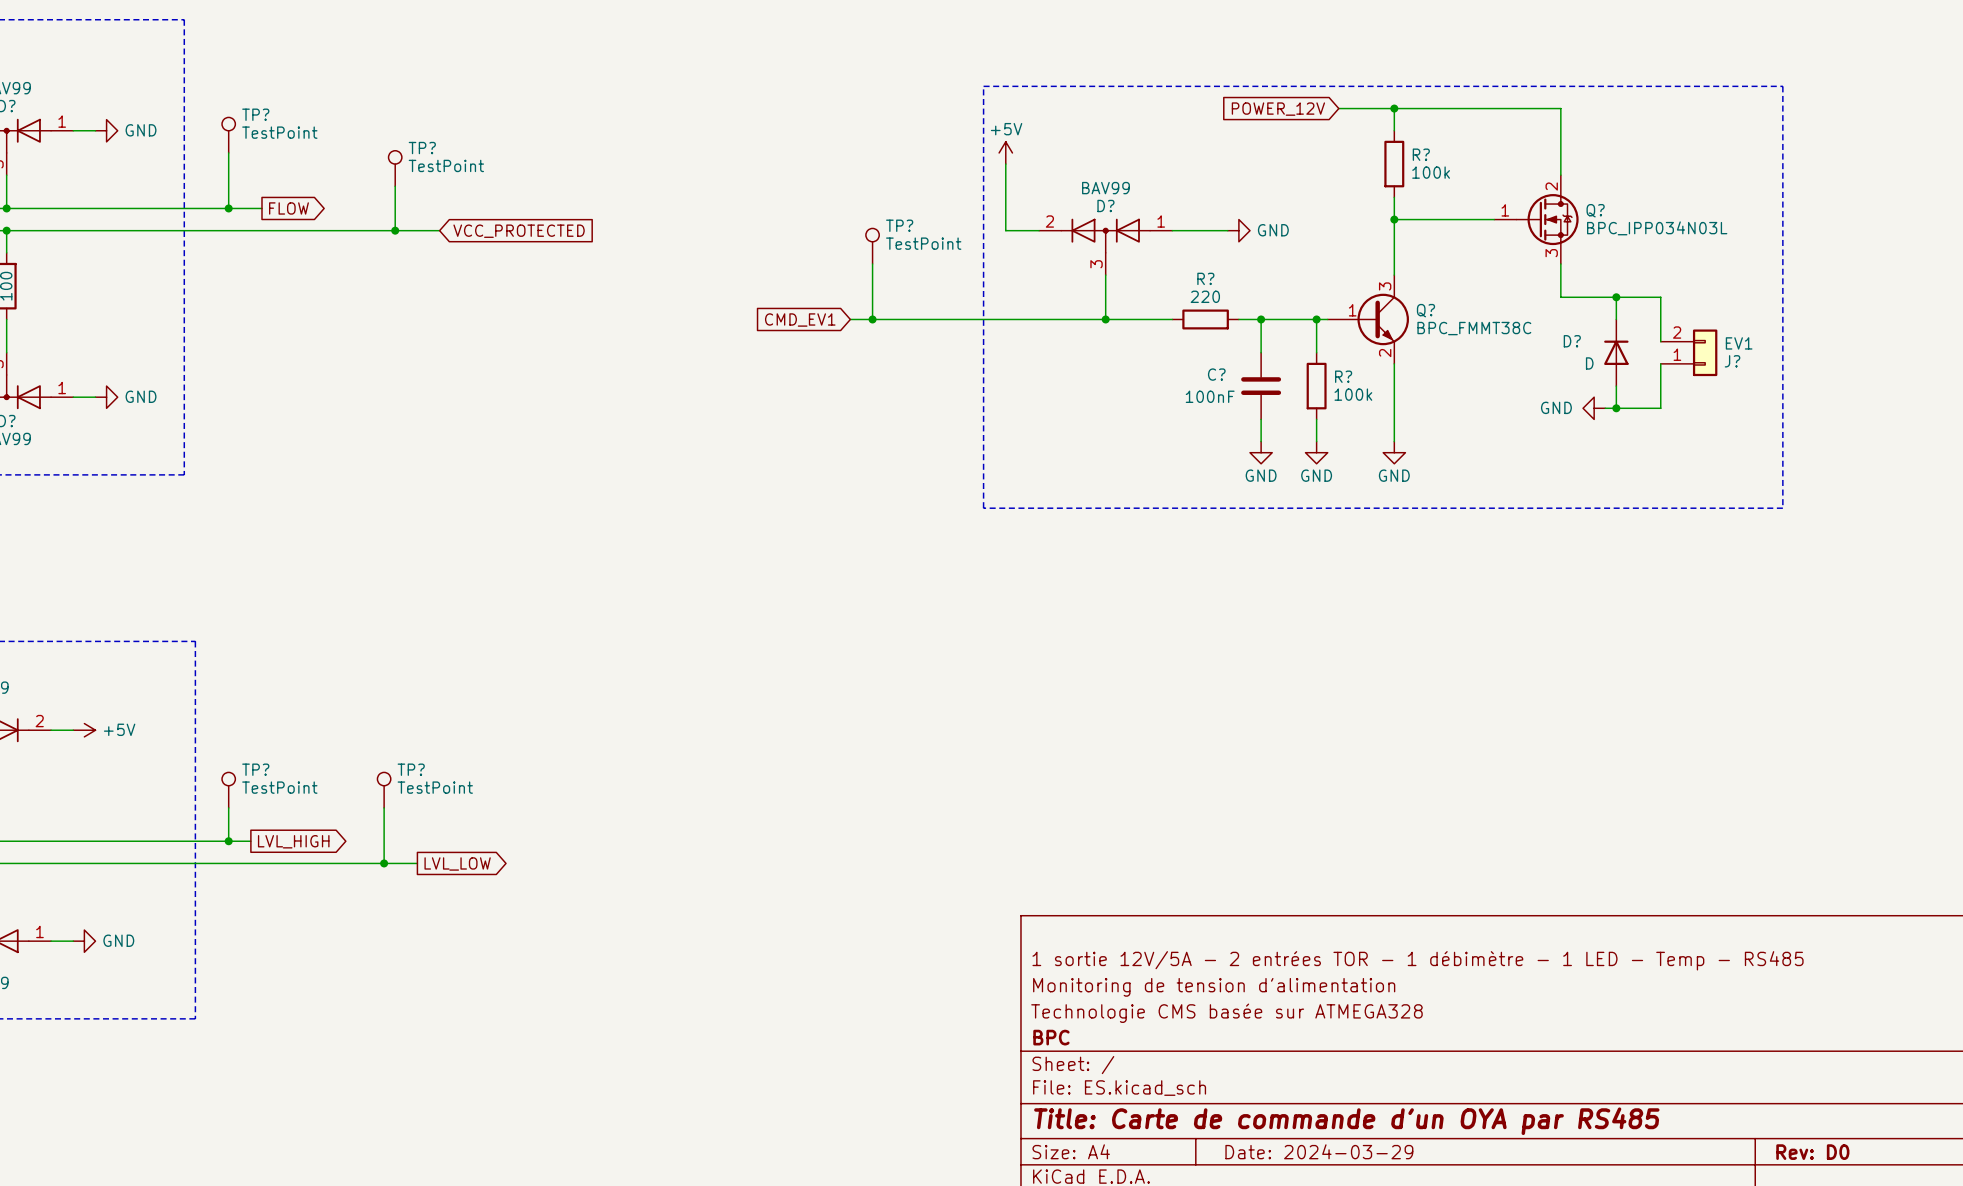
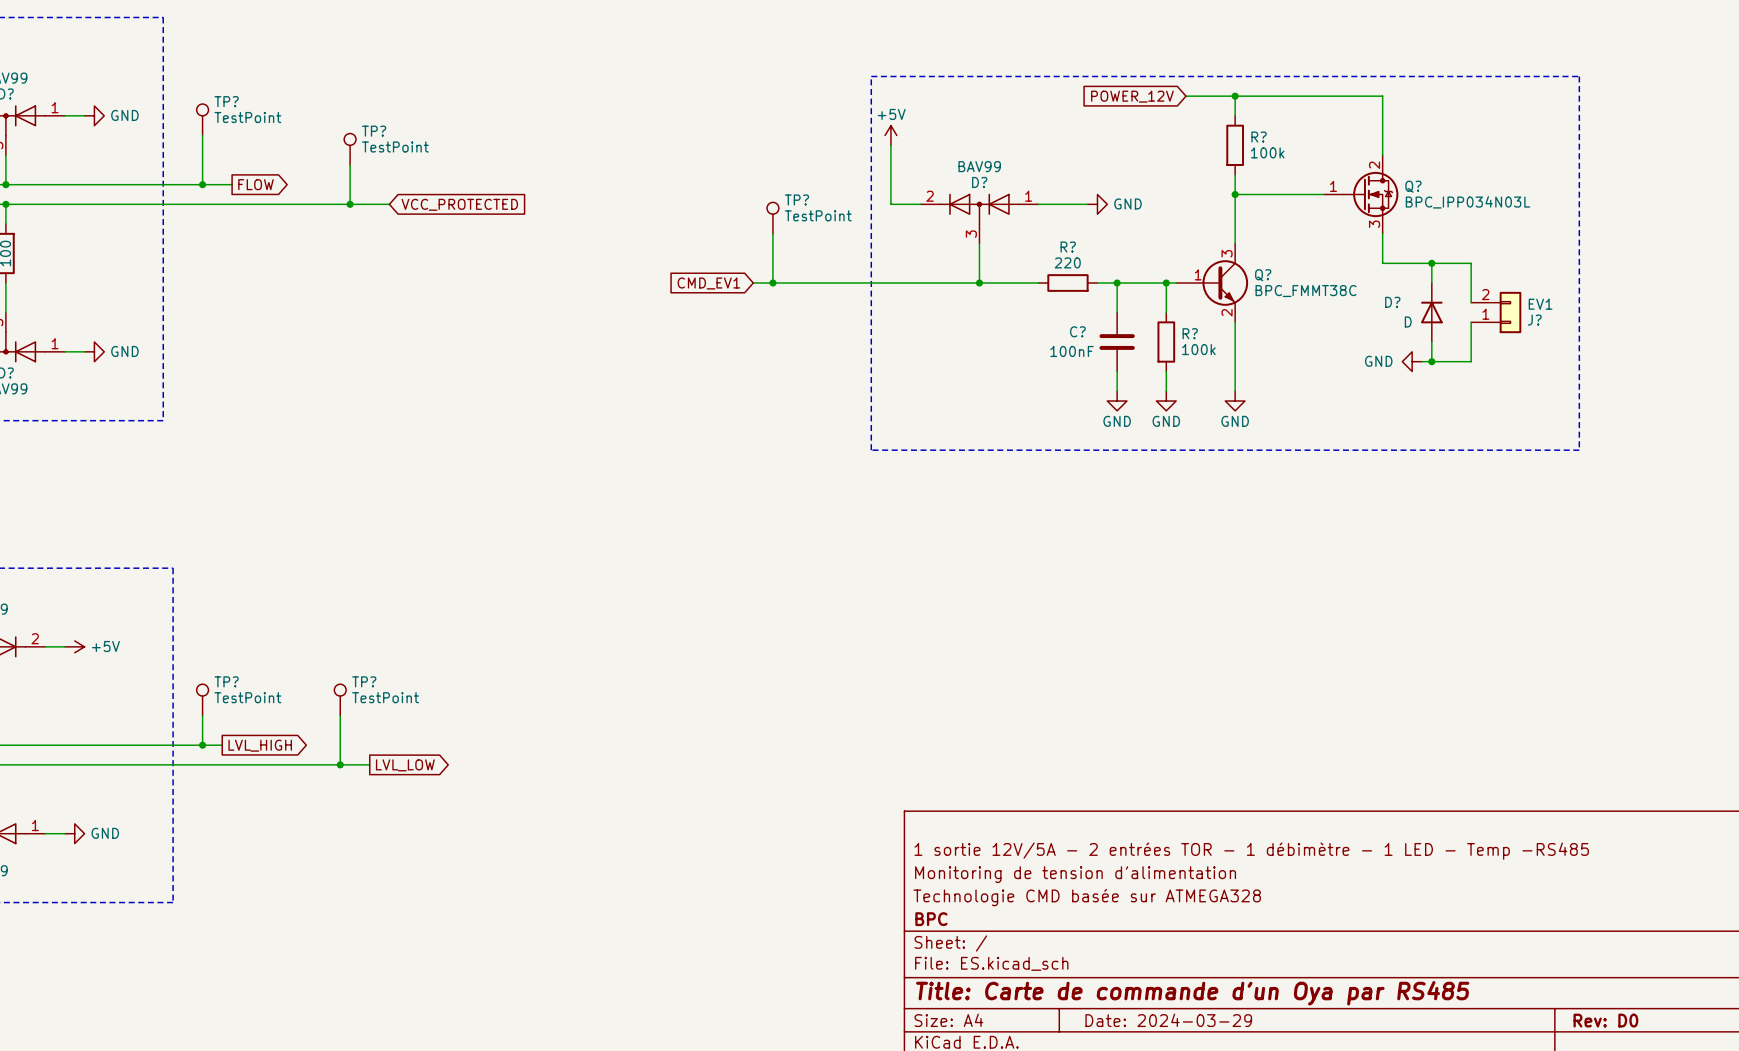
title block: 1 sortie 12V/5A - 2 entrées TOR - 1 débimètre - 1 LED - Temp - RS485 (1418, 960) -> 1 sortie 12V/5A - 2 entrées TOR - 1 débimètre - 1 LED - Temp -RS485 (1251, 851)
title block: Technologie CMS basée sur ATMEGA328 (1226, 1013) -> Technologie CMD basée sur ATMEGA328 (1087, 897)
title block: Title: Carte de commande d'un OYA par RS485 (1346, 1121) -> Title: Carte de commande d'un Oya par RS485 (1192, 993)

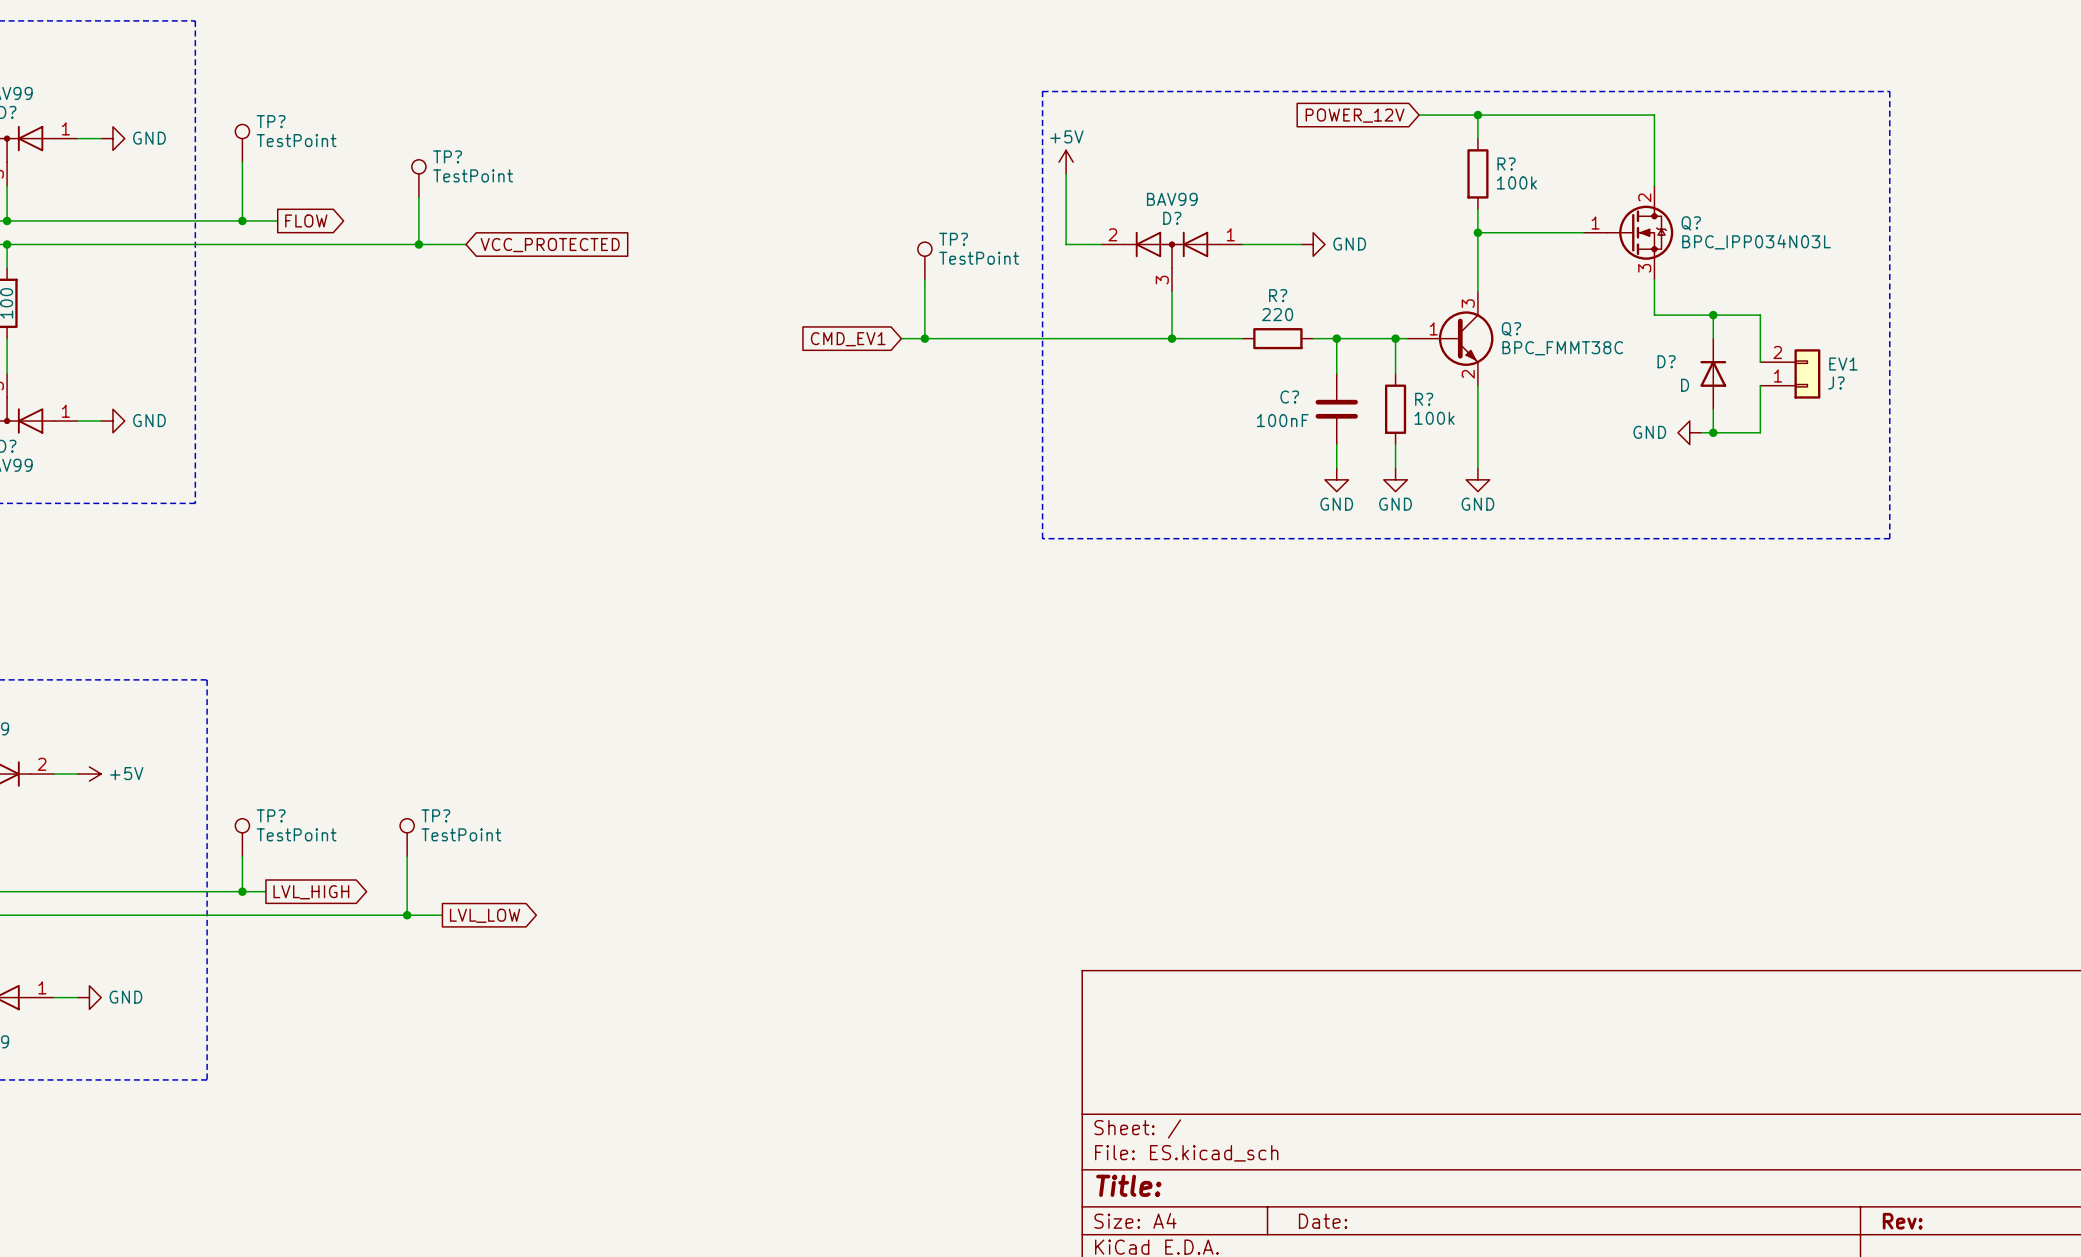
title block: 1 sortie 12V/5A - 2 entrées TOR - 1 débimètre - 1 LED - Temp -RS485 (1251, 851) -> none
title block: Monitoring de tension d'alimentation (1075, 874) -> none
title block: Technologie CMD basée sur ATMEGA328 (1087, 897) -> none
title block: BPC (931, 919) -> none
title block: Title: Carte de commande d'un Oya par RS485 (1192, 993) -> Title: (1128, 1185)
title block: Date: 2024-03-29 (1168, 1020) -> Date: (1323, 1221)
title block: Rev: D0 (1605, 1020) -> Rev: (1902, 1221)

